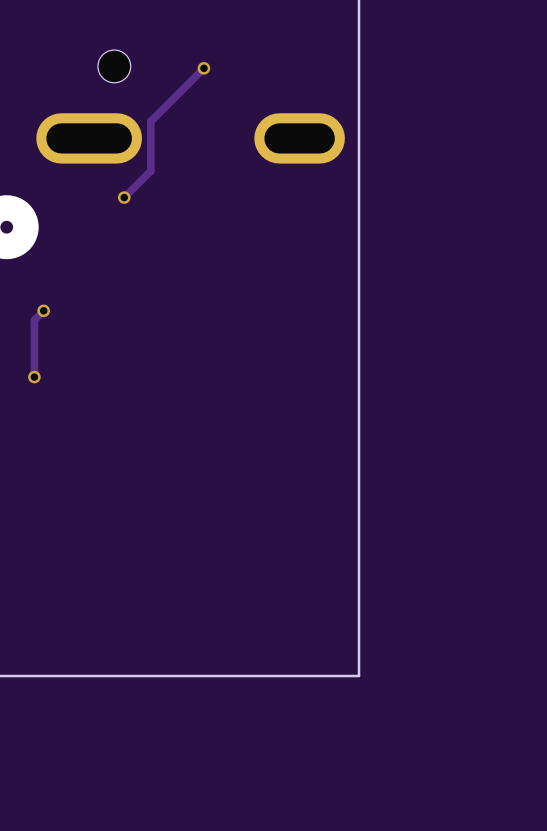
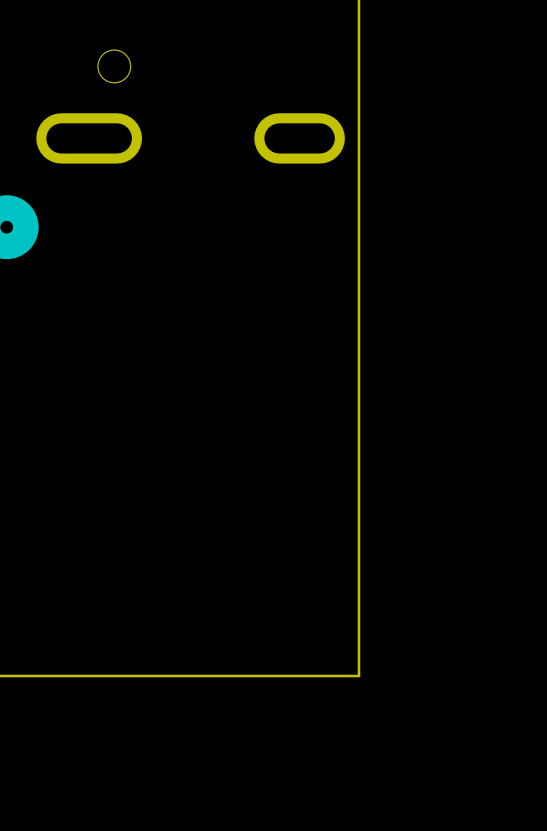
track: (203, 68) (150, 121) (150, 170) (124, 197) -> none
via: (203, 68) -> none
via: (124, 197) -> none
track: (43, 310) (34, 320) (34, 377) -> none
via: (43, 310) -> none
via: (34, 377) -> none

